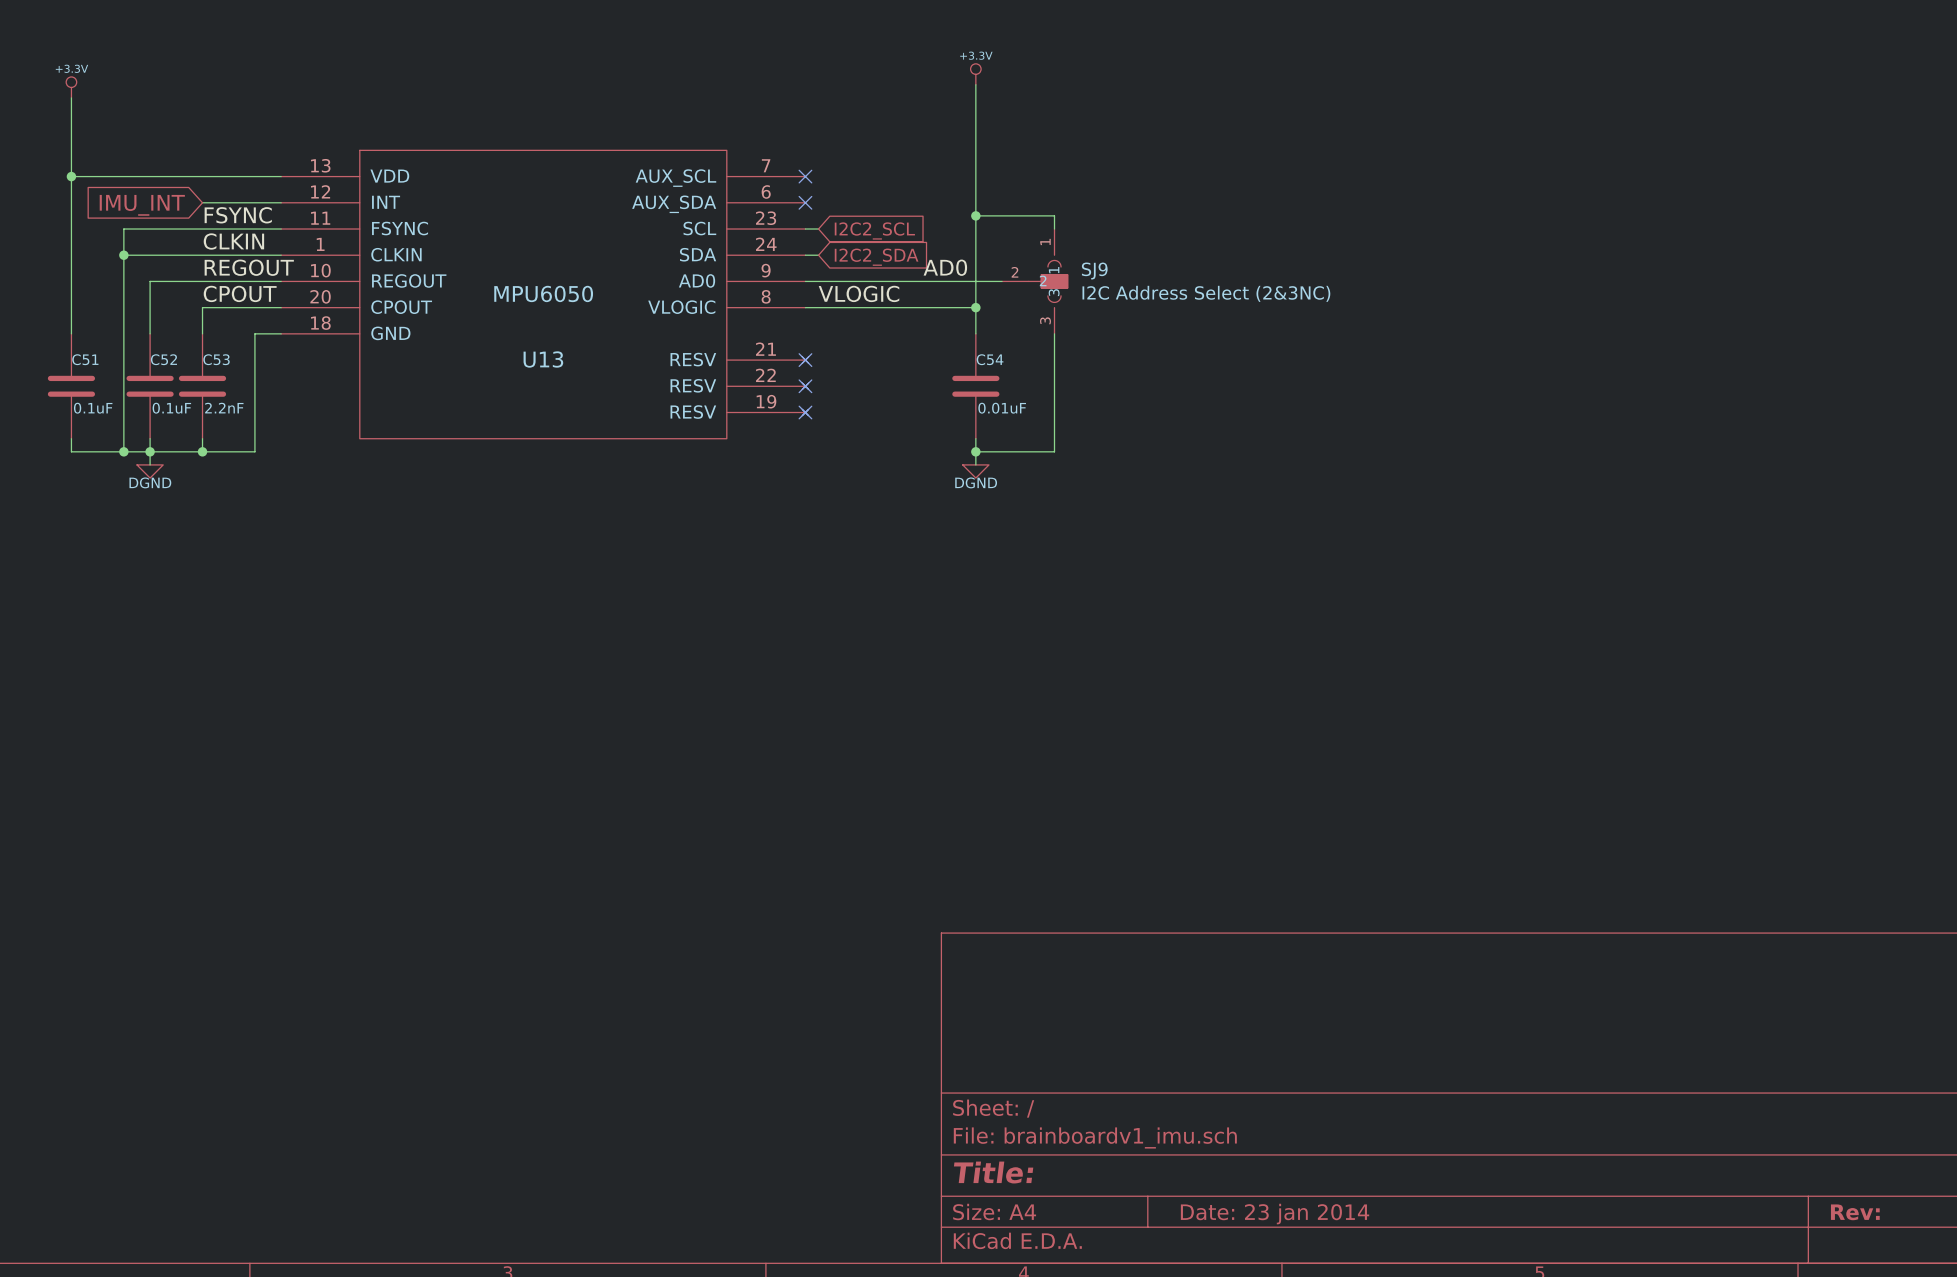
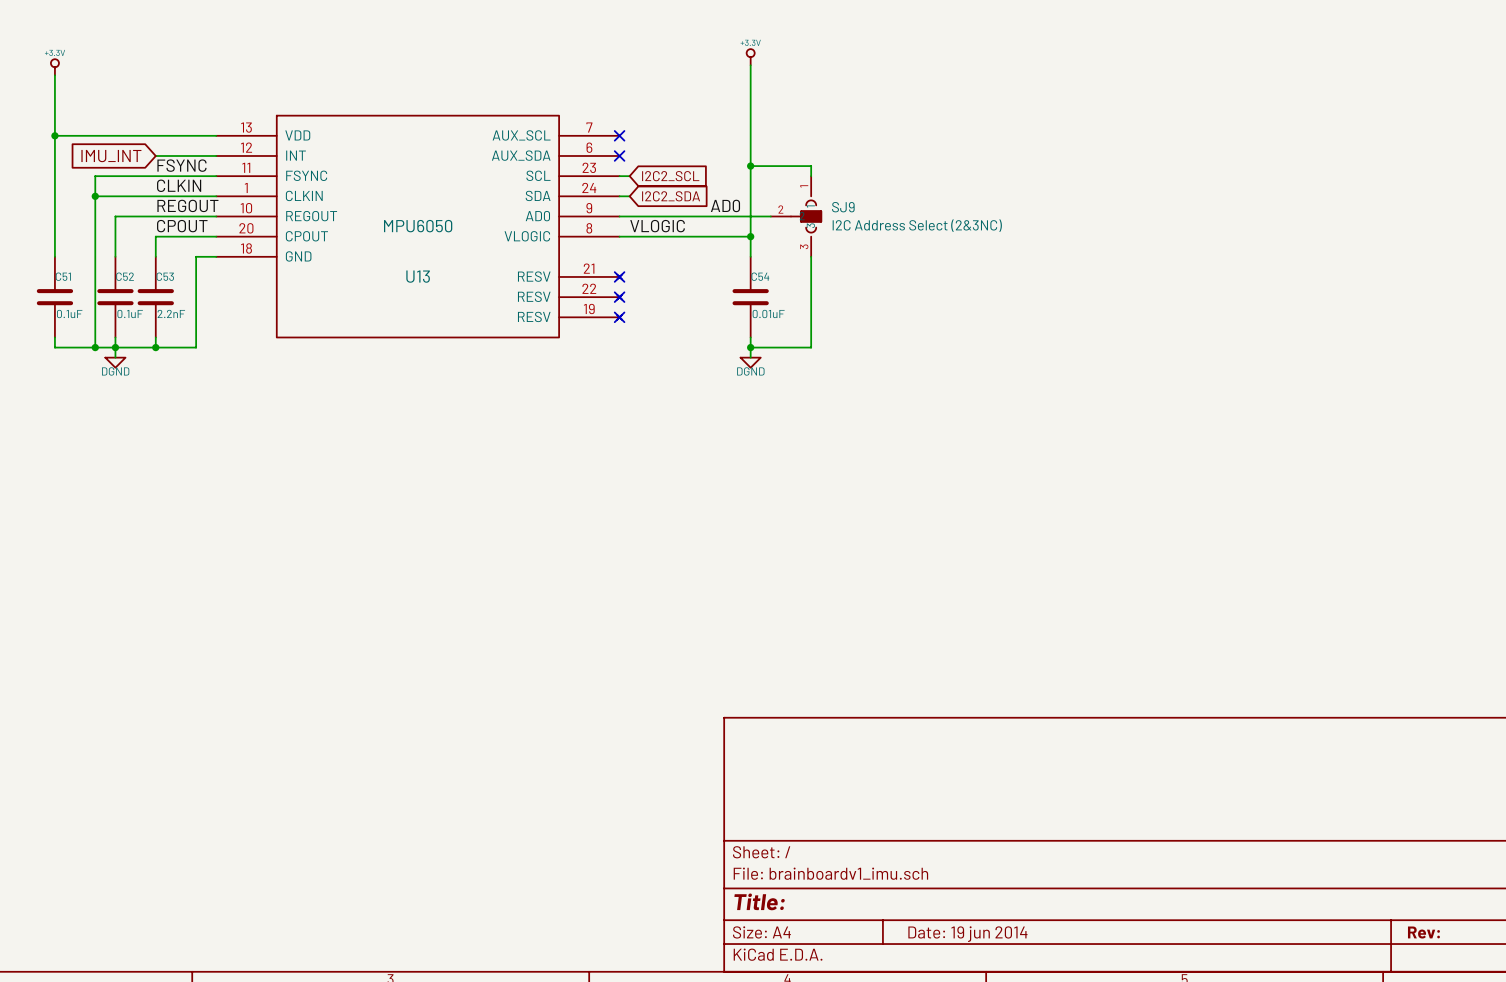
title block: Date: 23 jan 2014 (1275, 1214) -> Date: 19 jun 2014 (967, 934)

